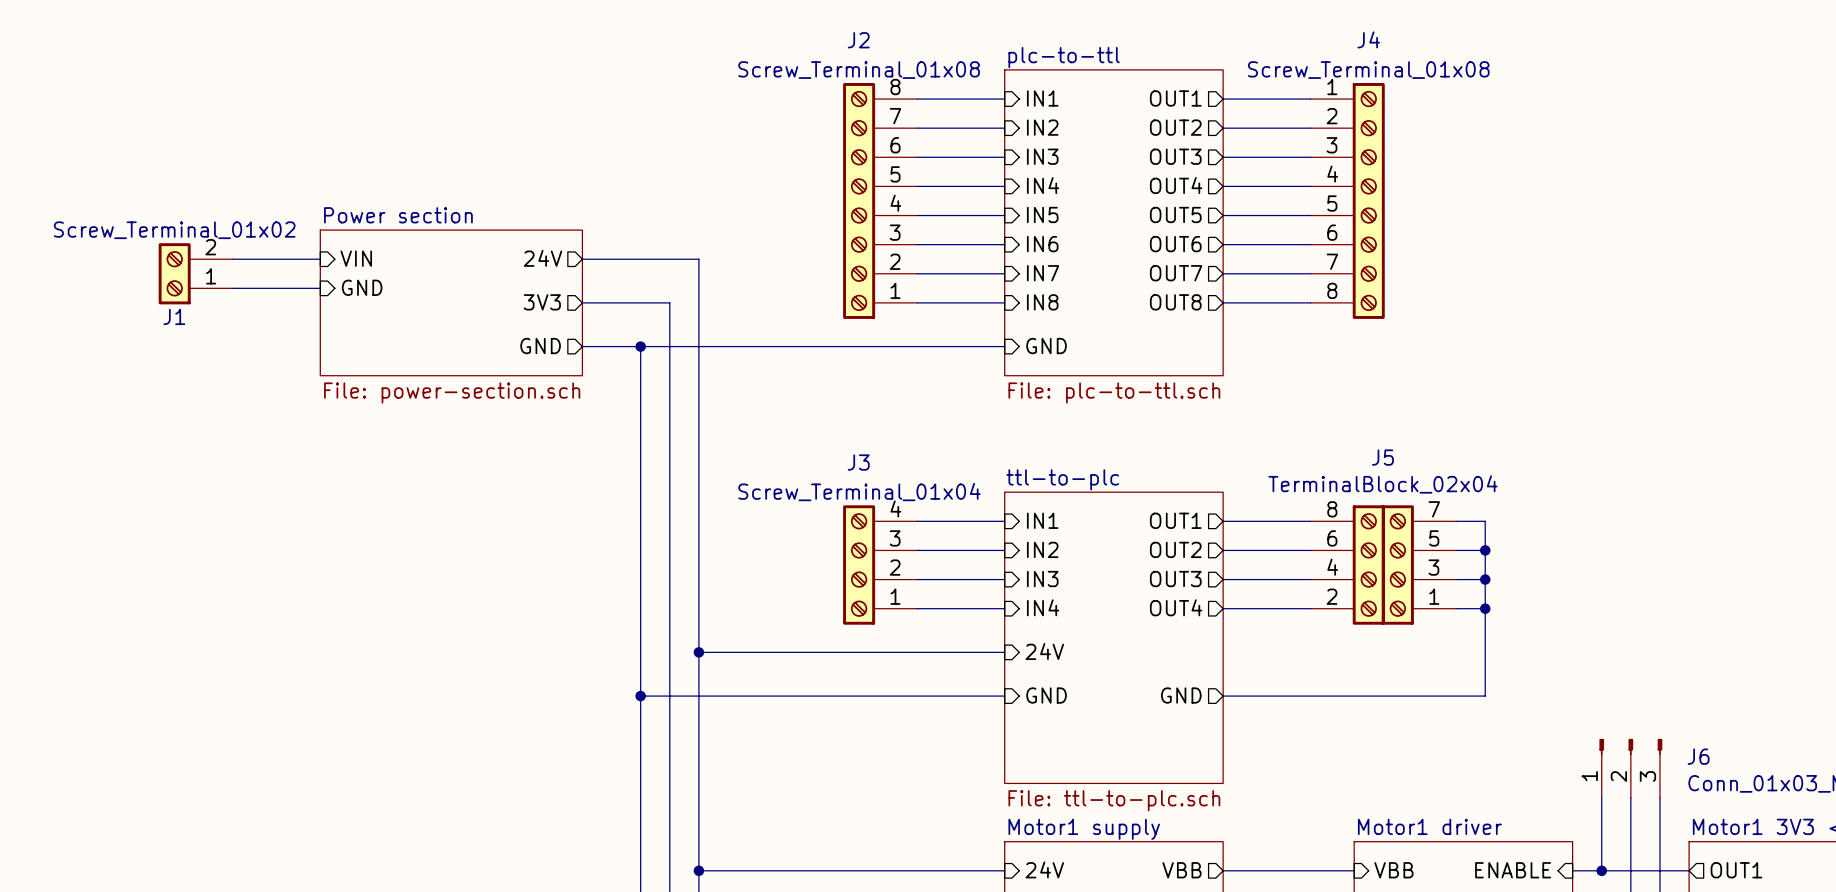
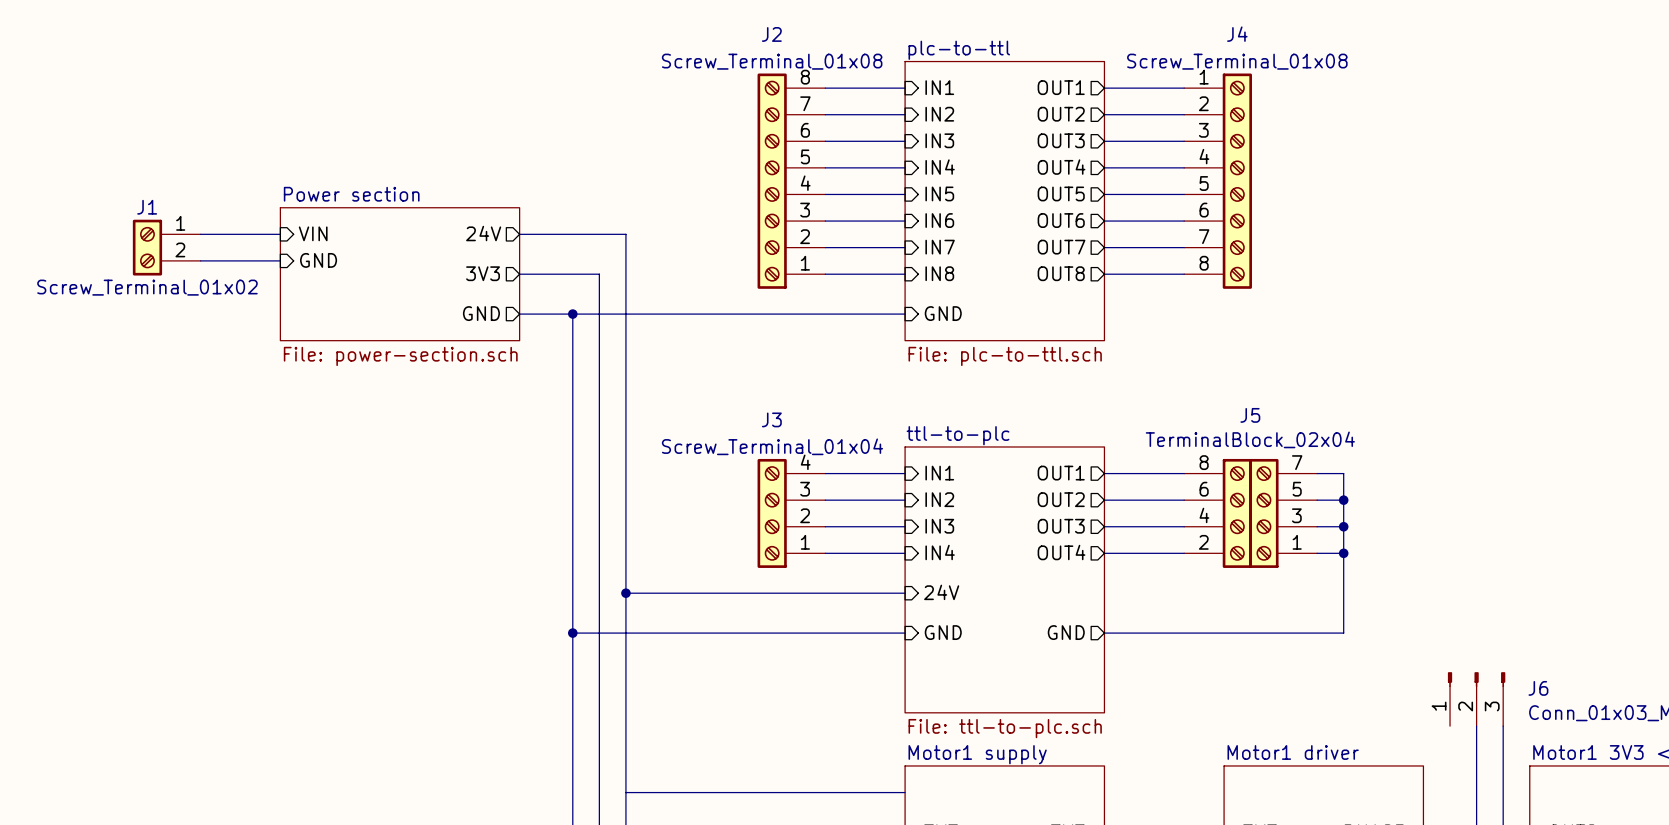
J1 flip: as is (174, 273) -> up-down (147, 247)
wire: (1601, 797) (1601, 870) -> none
sheet pin: 24V (1044, 869) -> none
junction: (698, 870) -> none
sheet pin: VBB (1181, 870) -> none
wire: (1223, 870) (1354, 870) -> none
sheet pin: VBB (1393, 870) -> none
sheet pin: ENABLE (1513, 870) -> none
wire: (1572, 870) (1689, 870) -> none
junction: (1601, 870) -> none
sheet pin: OUT1 (1736, 870) -> none

